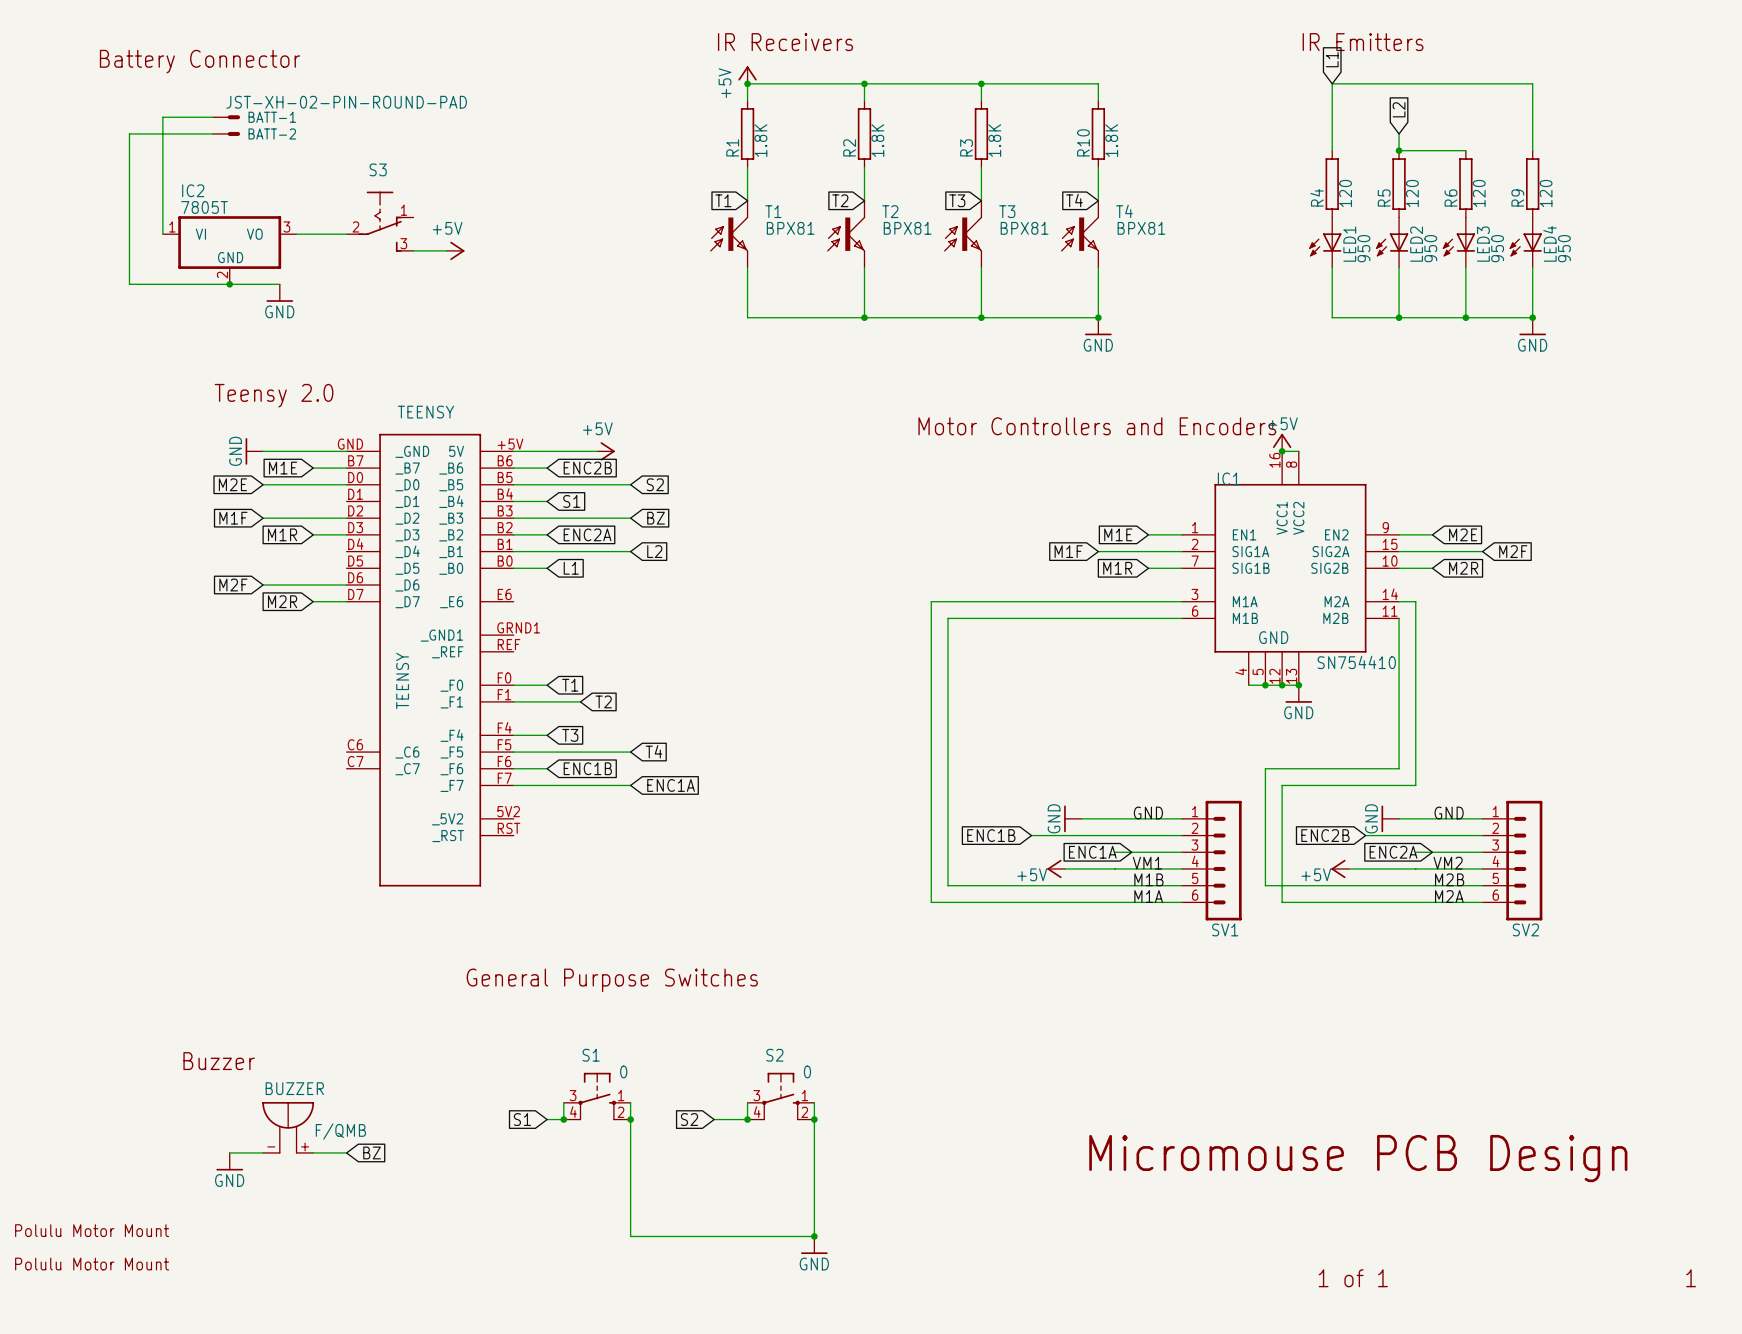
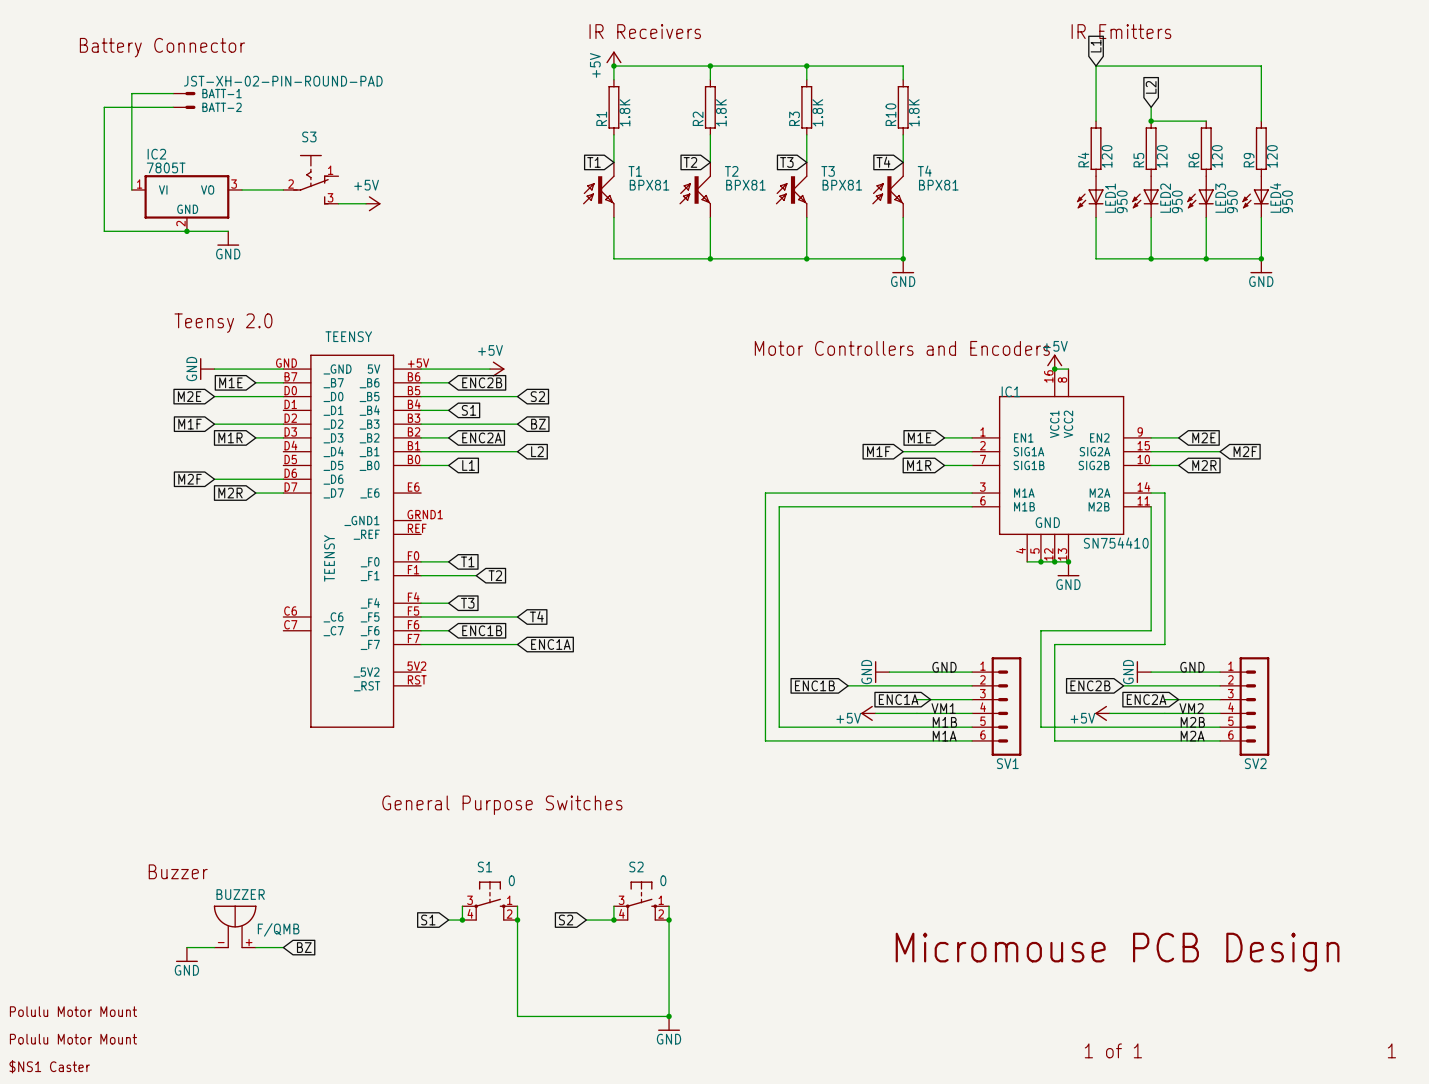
part: none -> (49, 1066)

